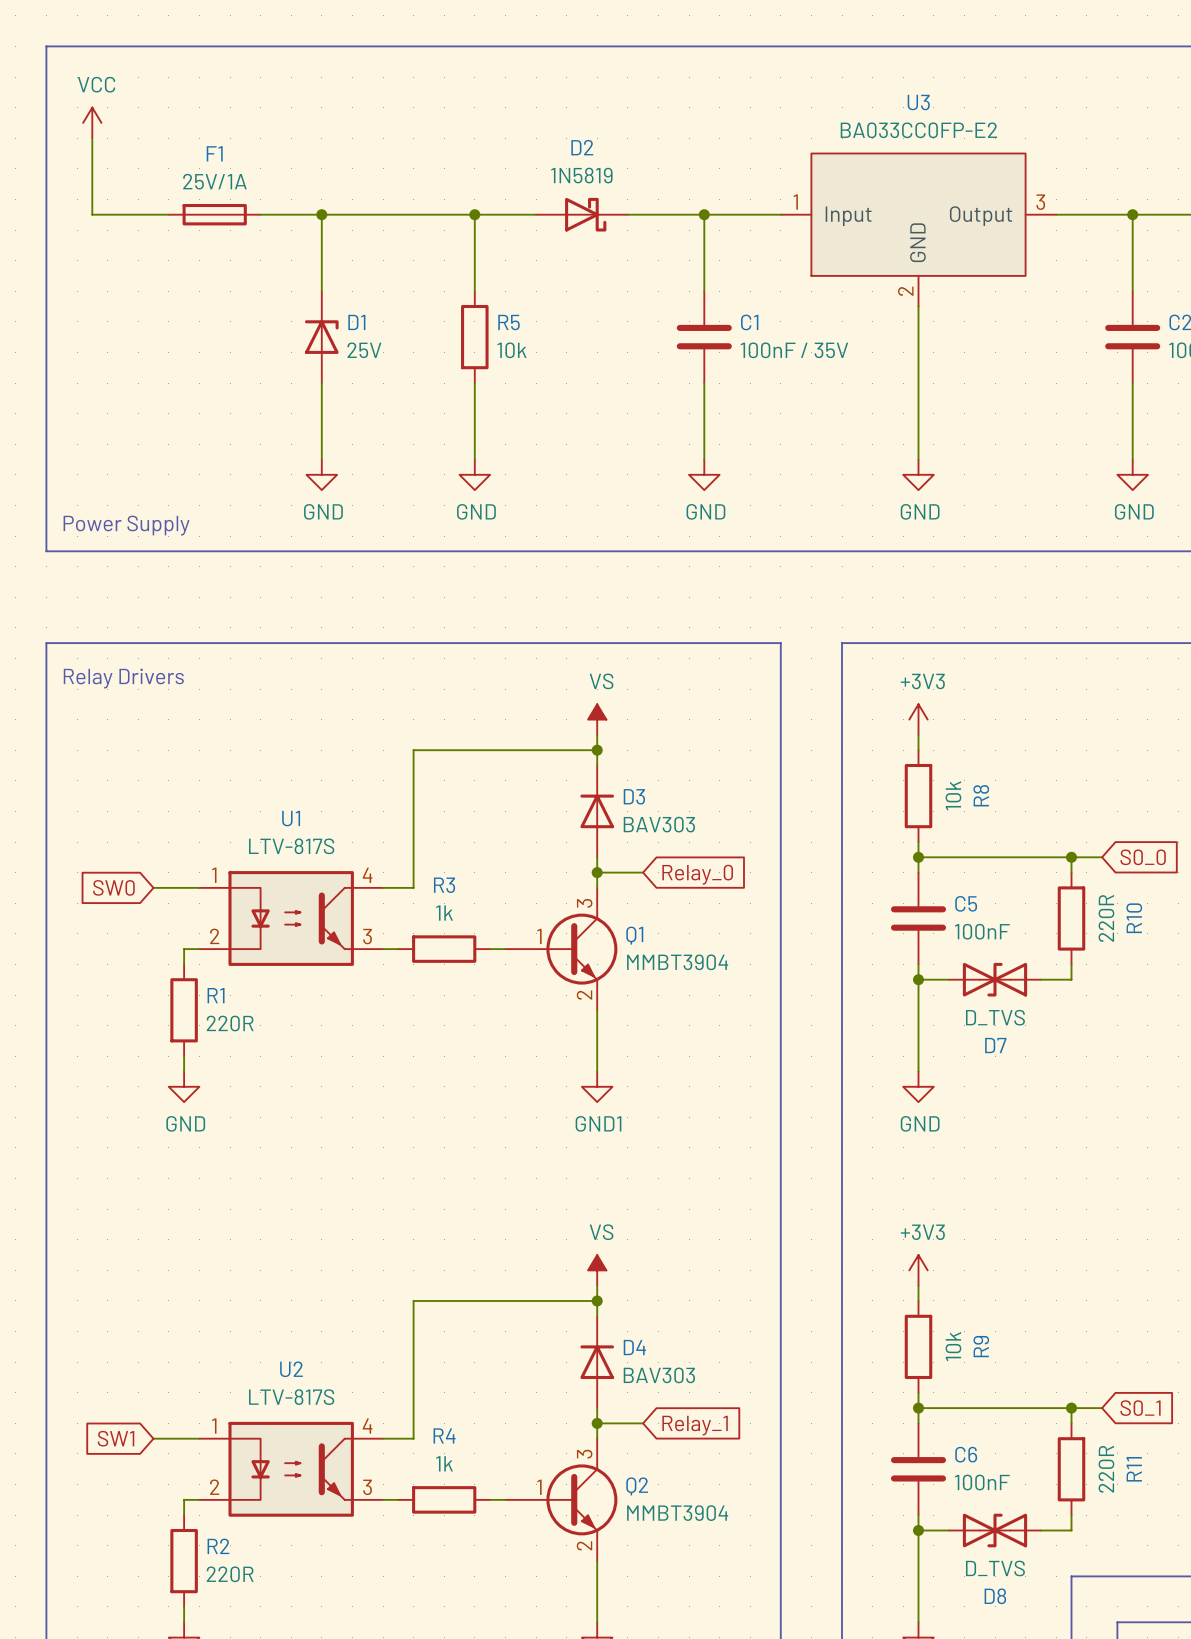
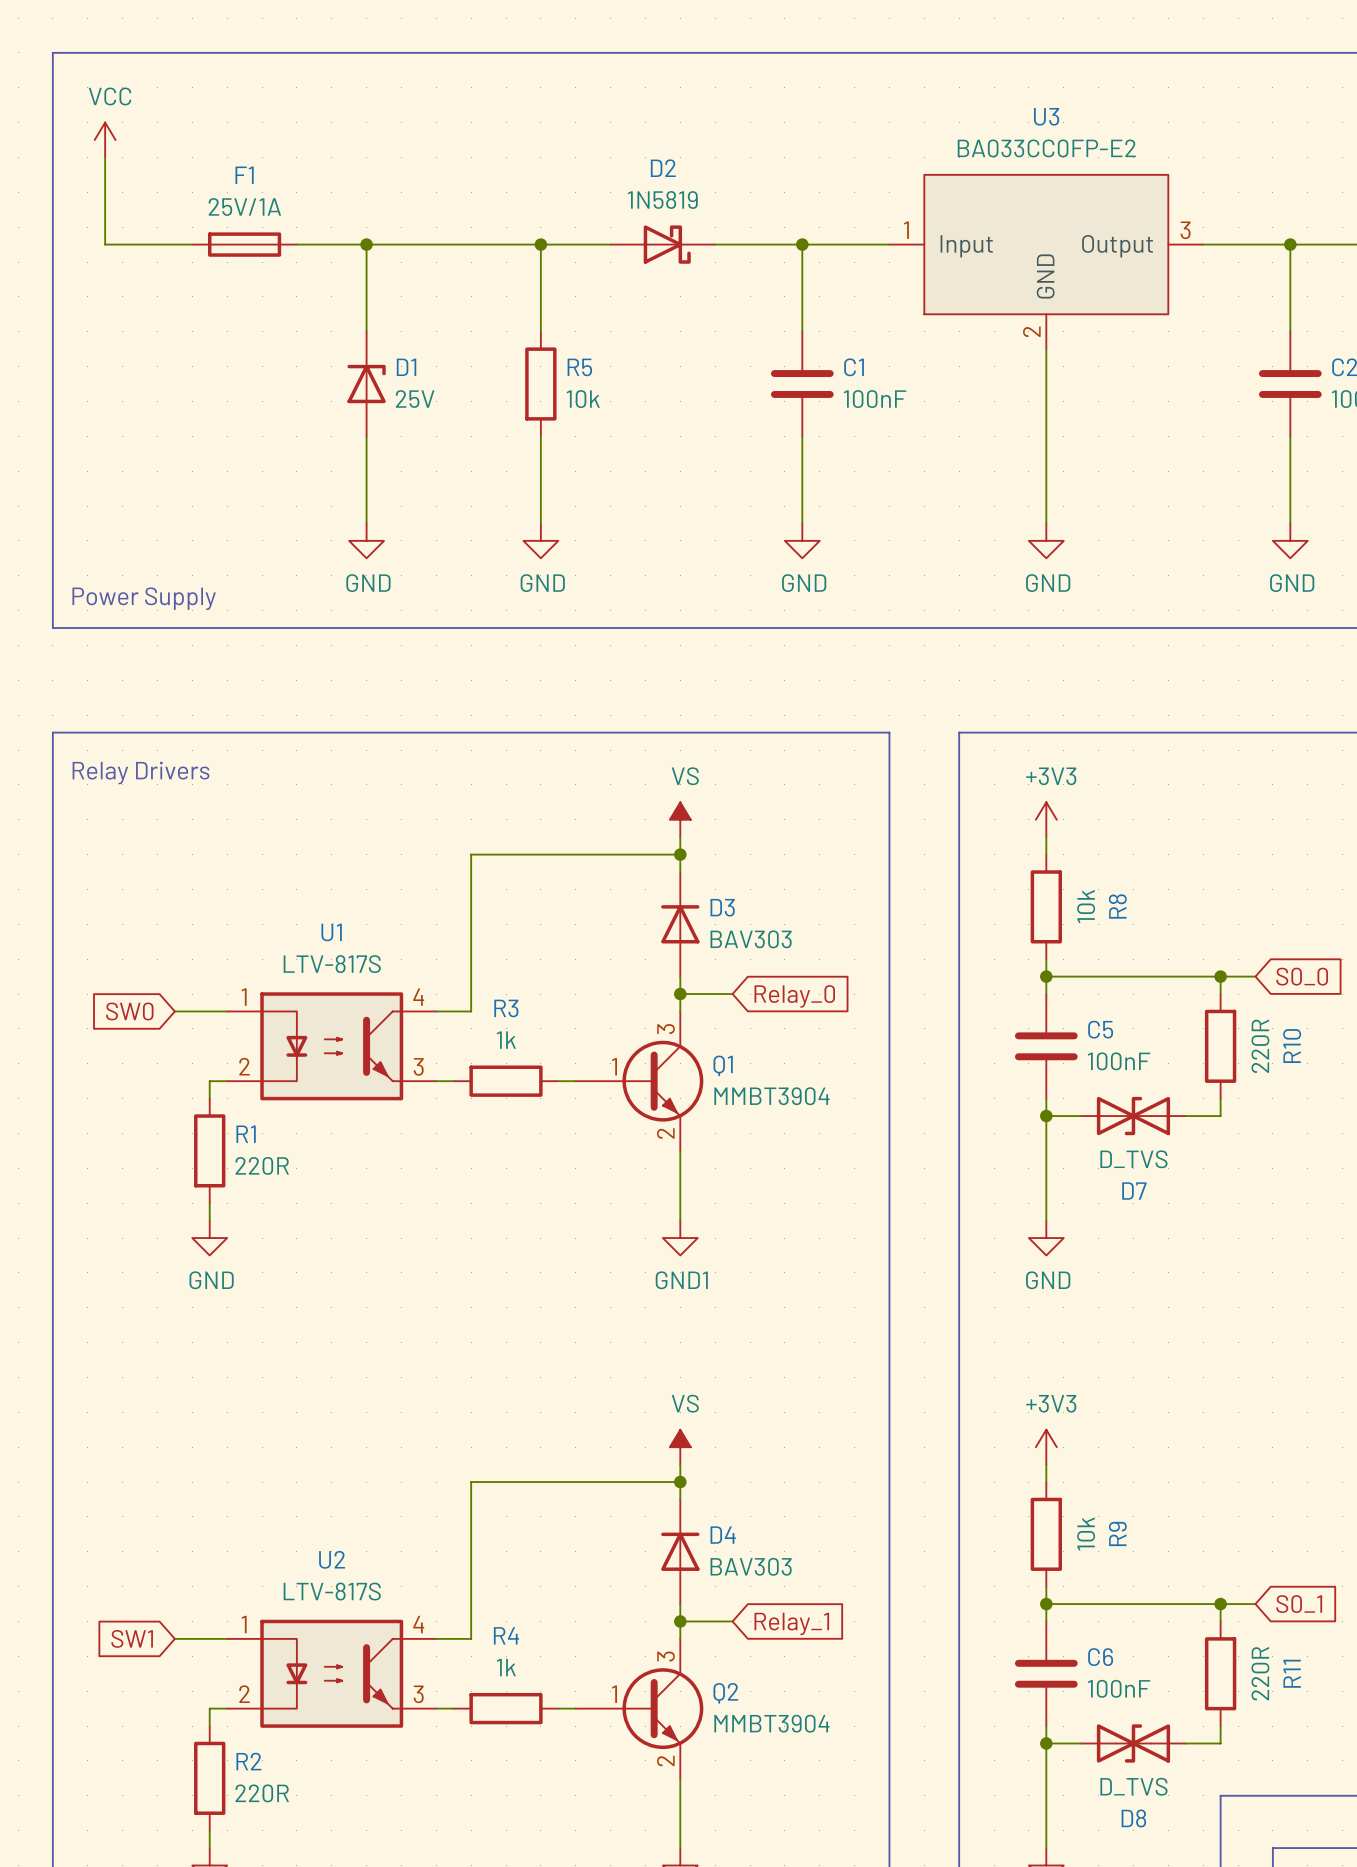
C1 value: 100nF / 35V (794, 350) -> 100nF (875, 399)

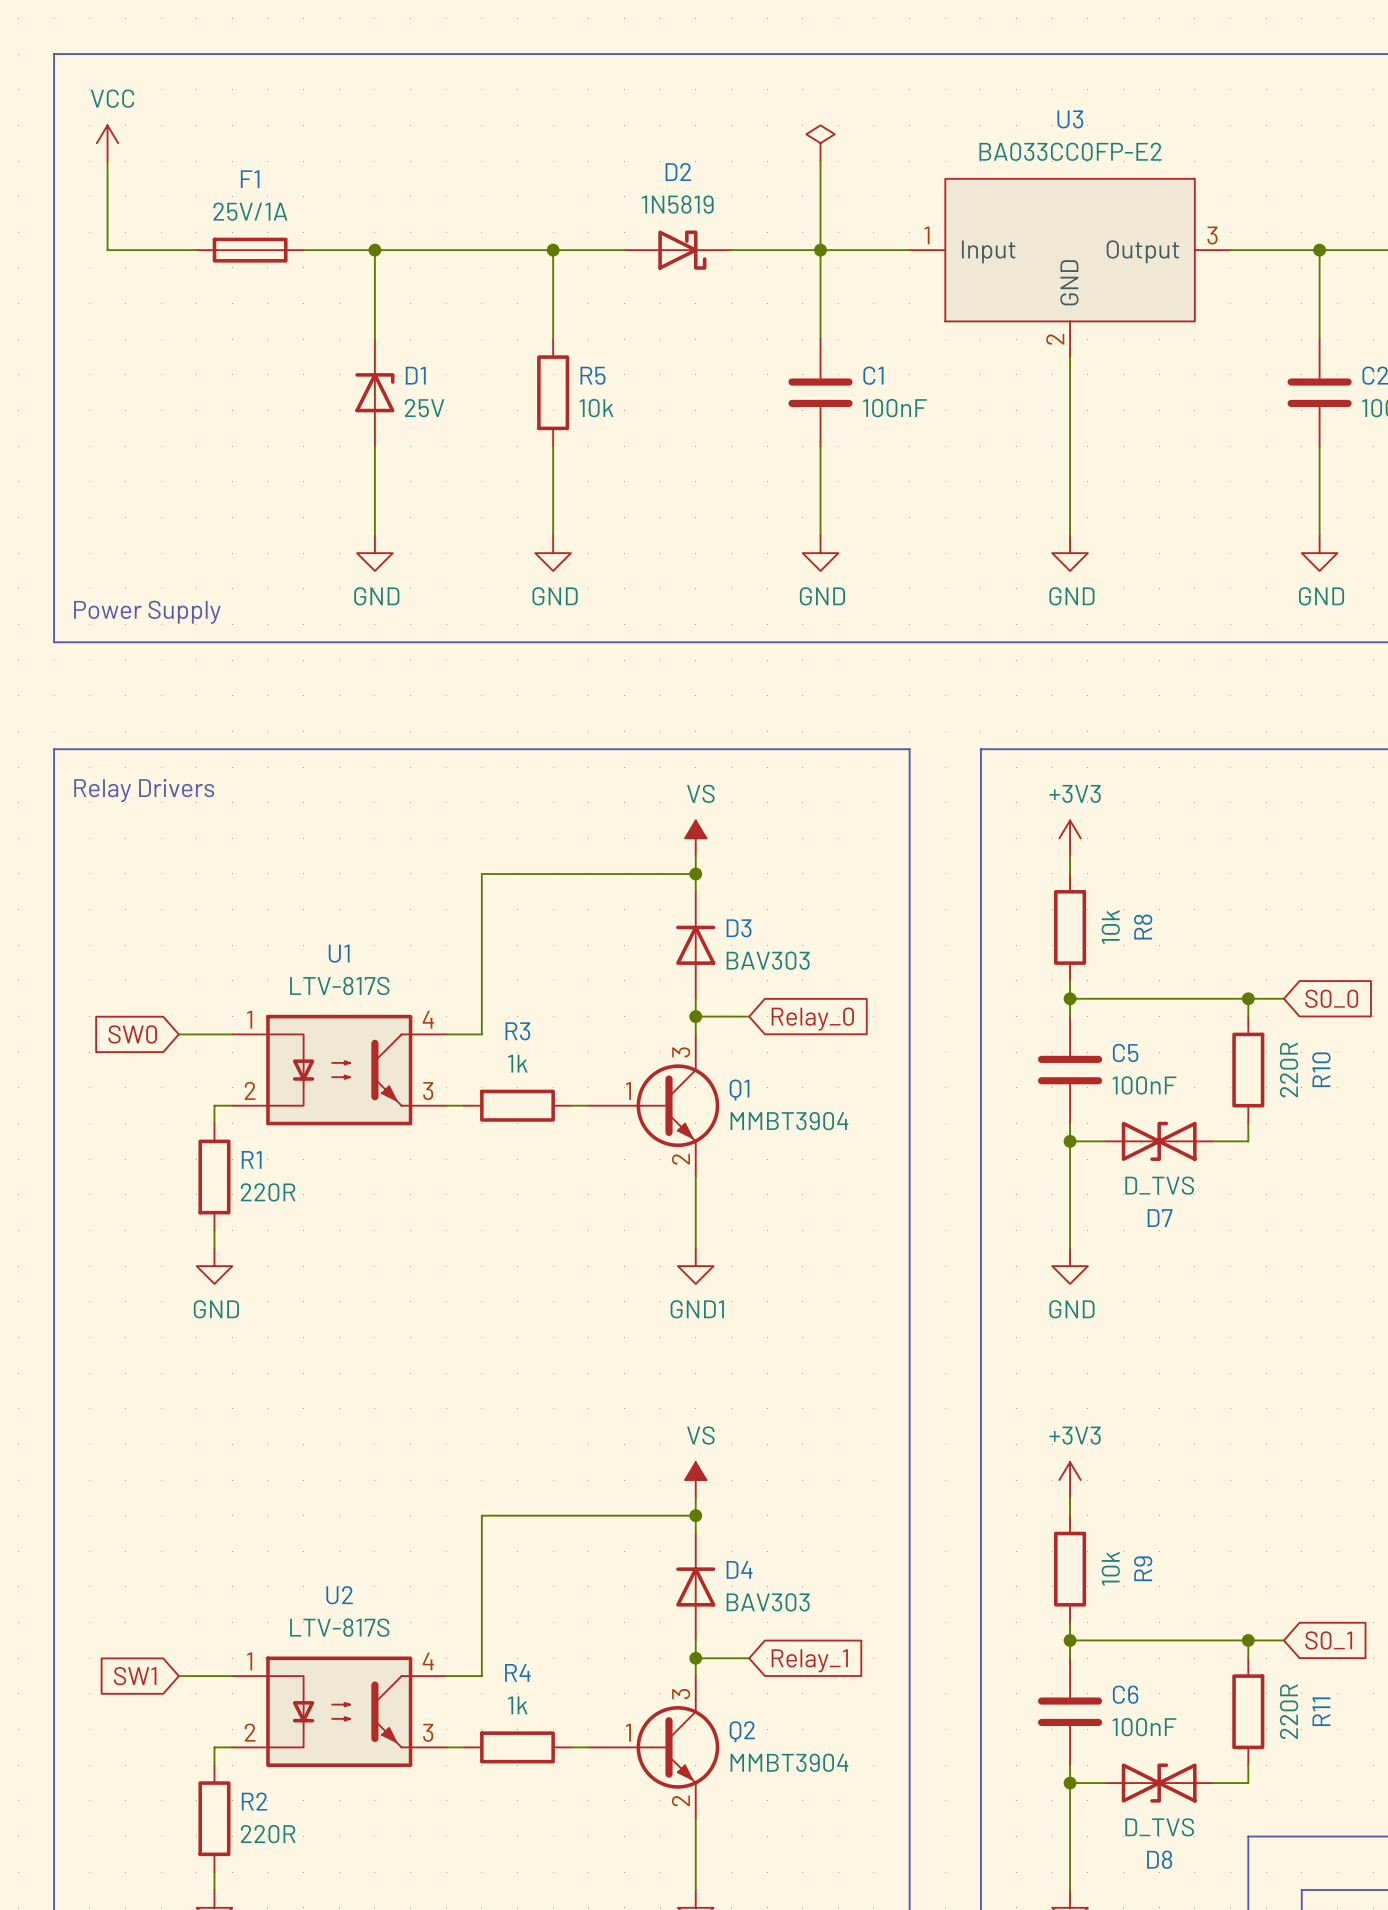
power symbol: none -> (820, 143)
wire: none -> (820, 161) (820, 250)

